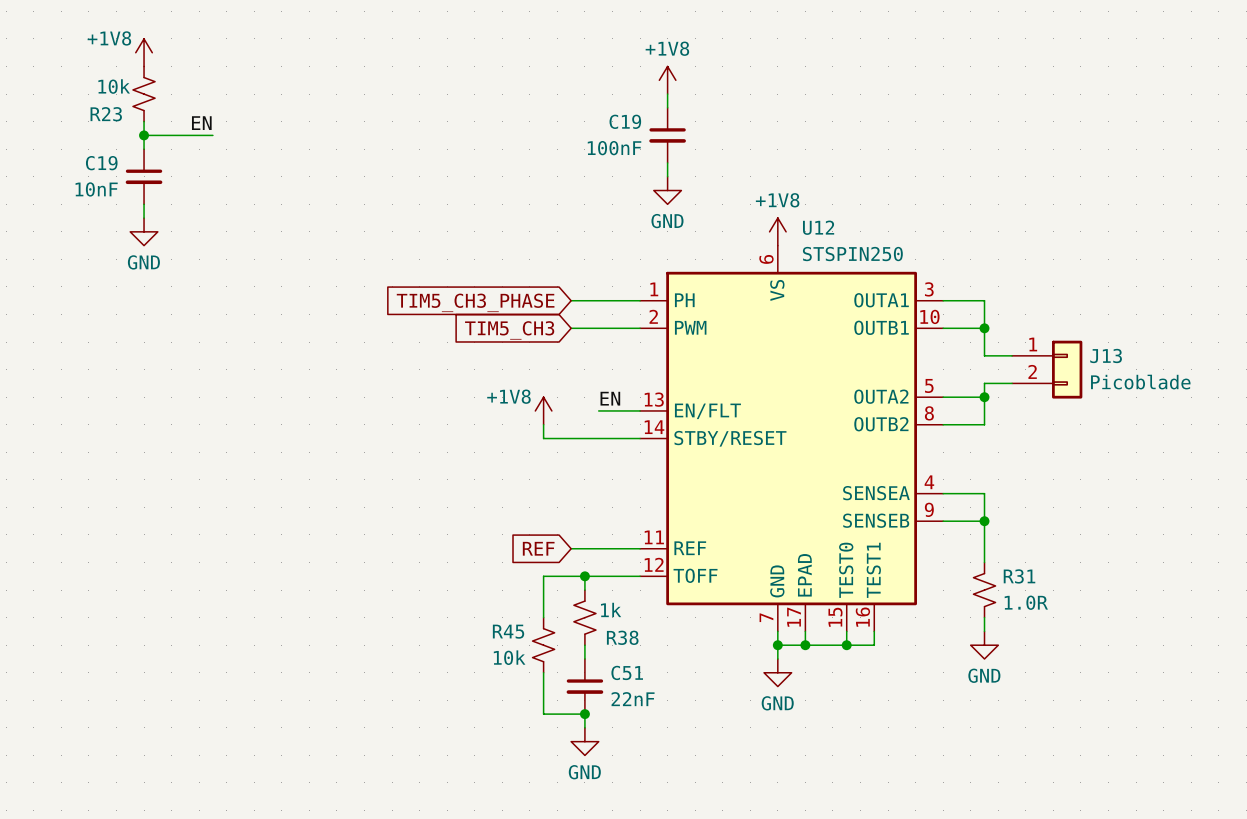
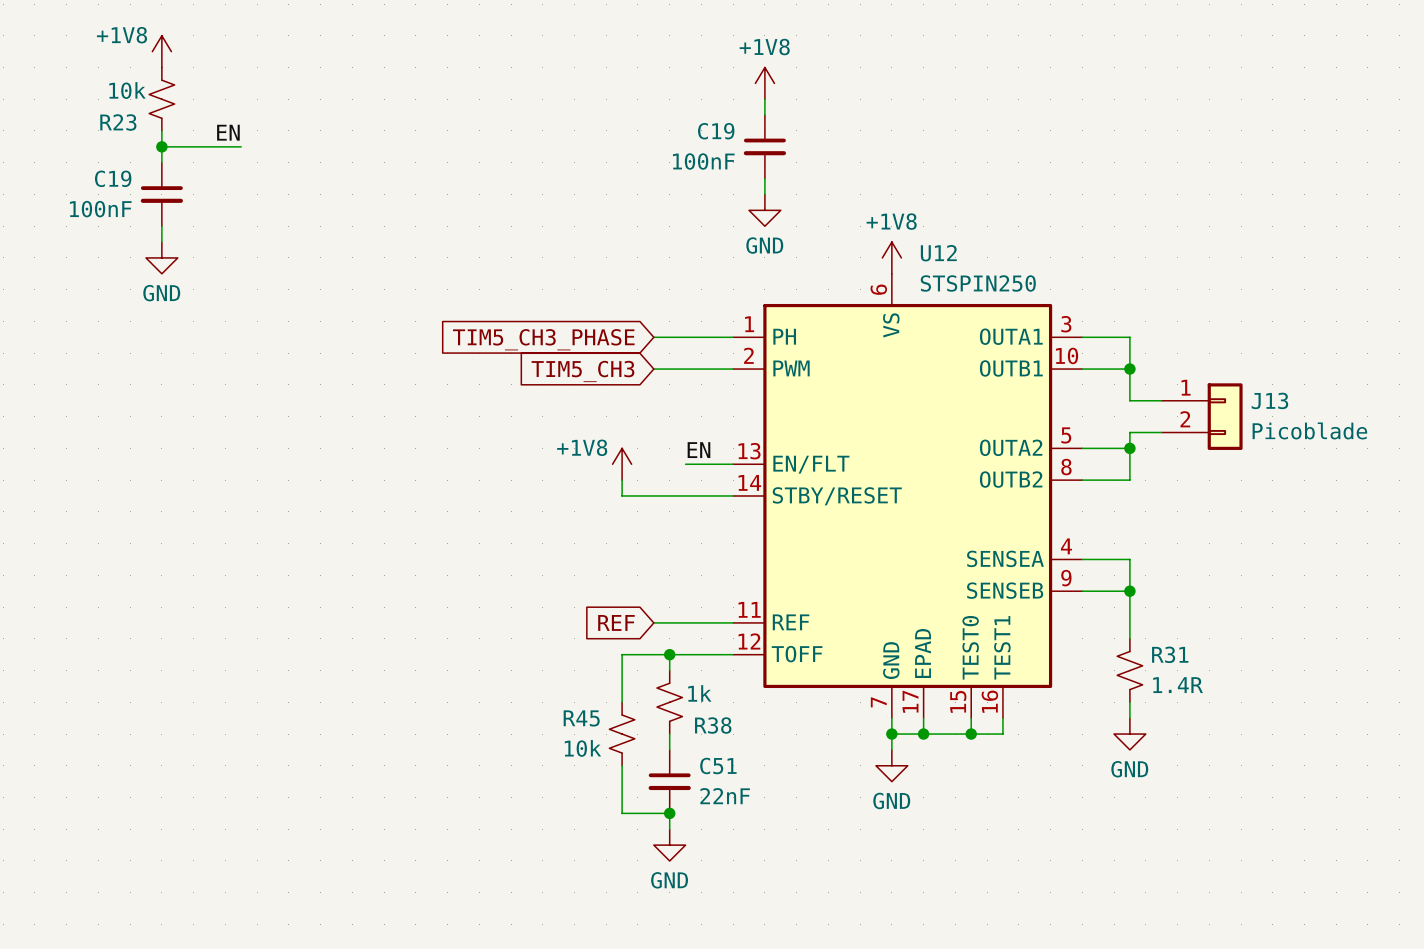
C19 value: 10nF (96, 189) -> 100nF (100, 209)
R31 value: 1.0R (1026, 602) -> 1.4R (1178, 685)

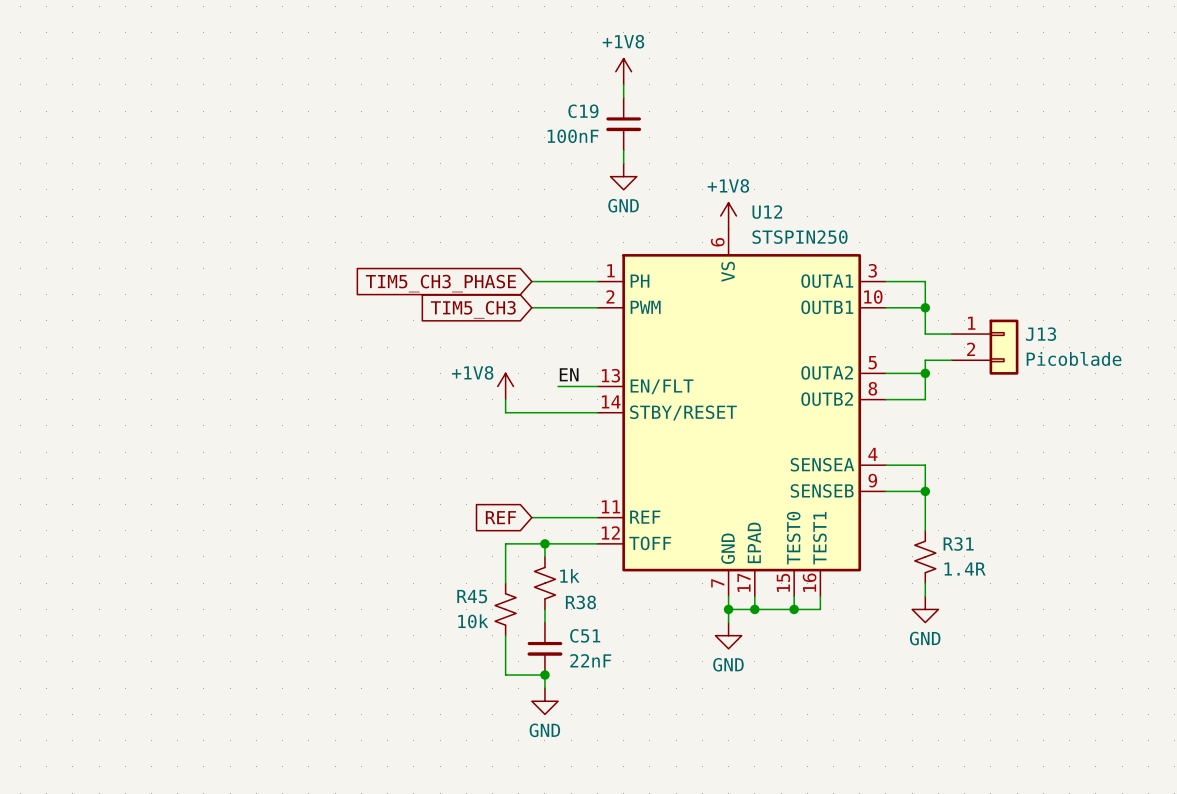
power symbol: +1V8 (161, 51) -> none
R23: 10k (161, 99) -> none
wire: (161, 130) (161, 162) -> none
label: EN (228, 132) -> none
wire: (161, 146) (241, 146) -> none
junction: (161, 146) -> none
C19: 100nF (161, 194) -> none
wire: (161, 226) (161, 242) -> none
power symbol: GND (161, 257) -> none

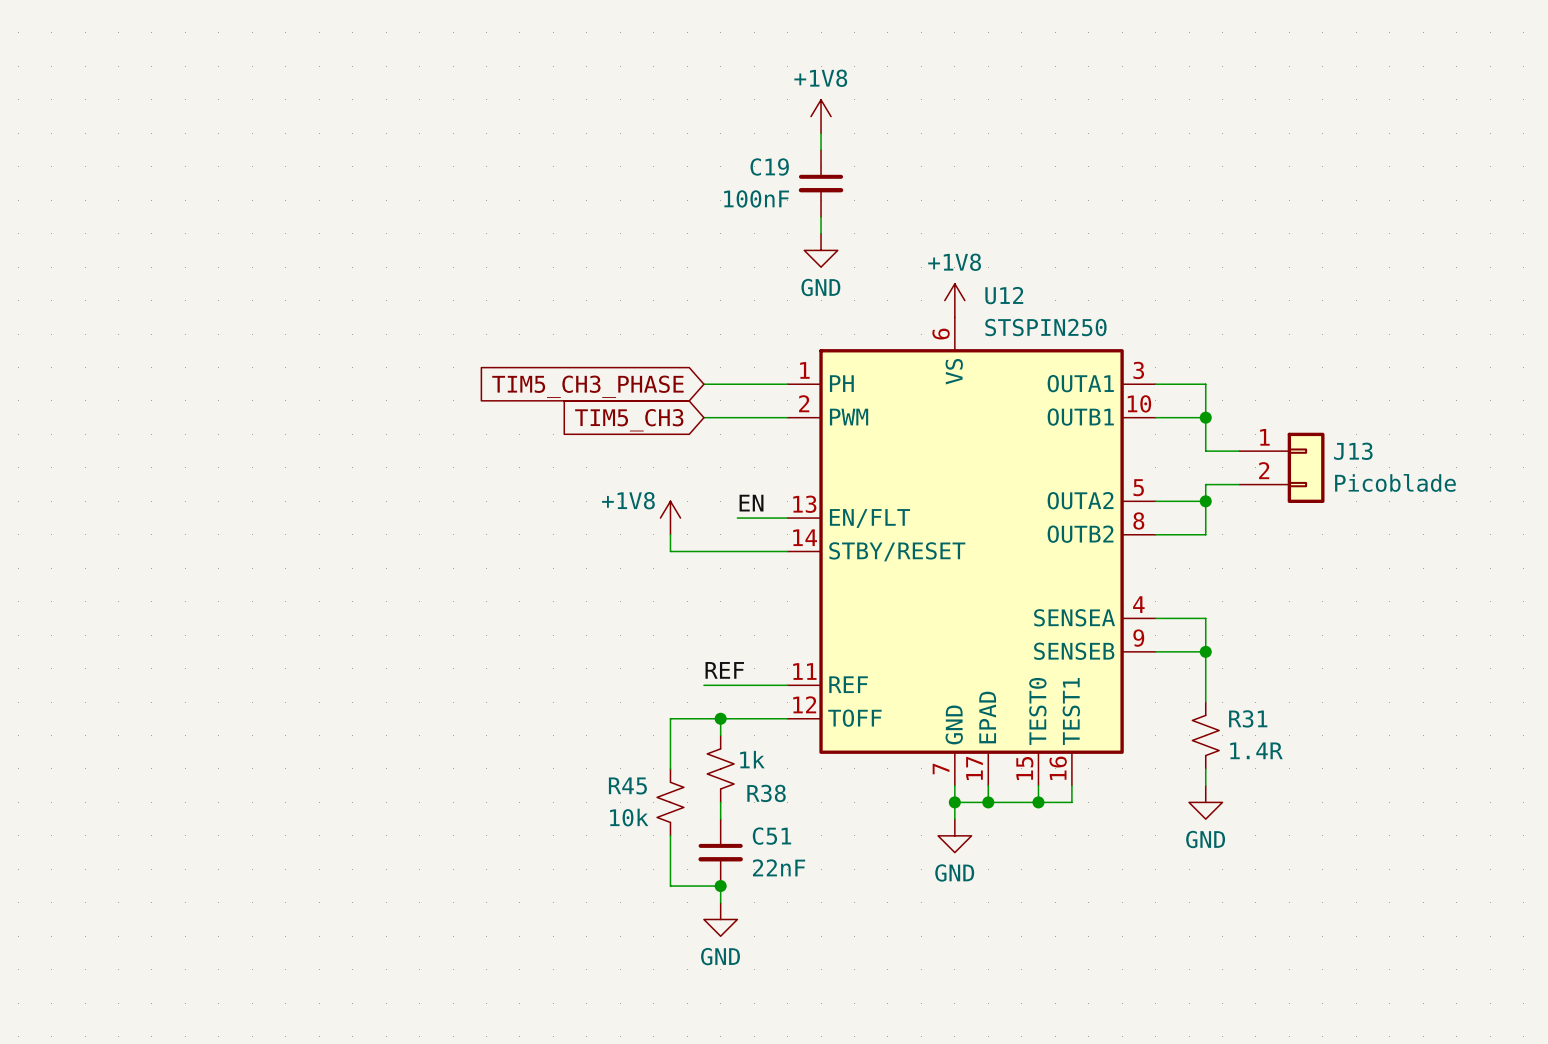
label: none -> REF (724, 670)
global label: REF (500, 517) -> none

